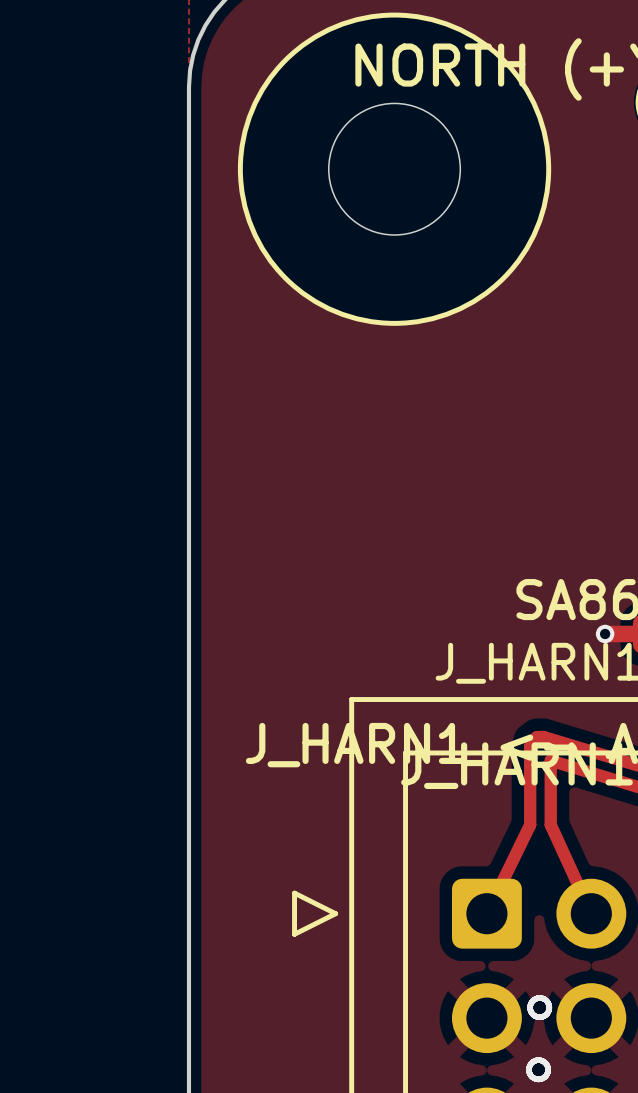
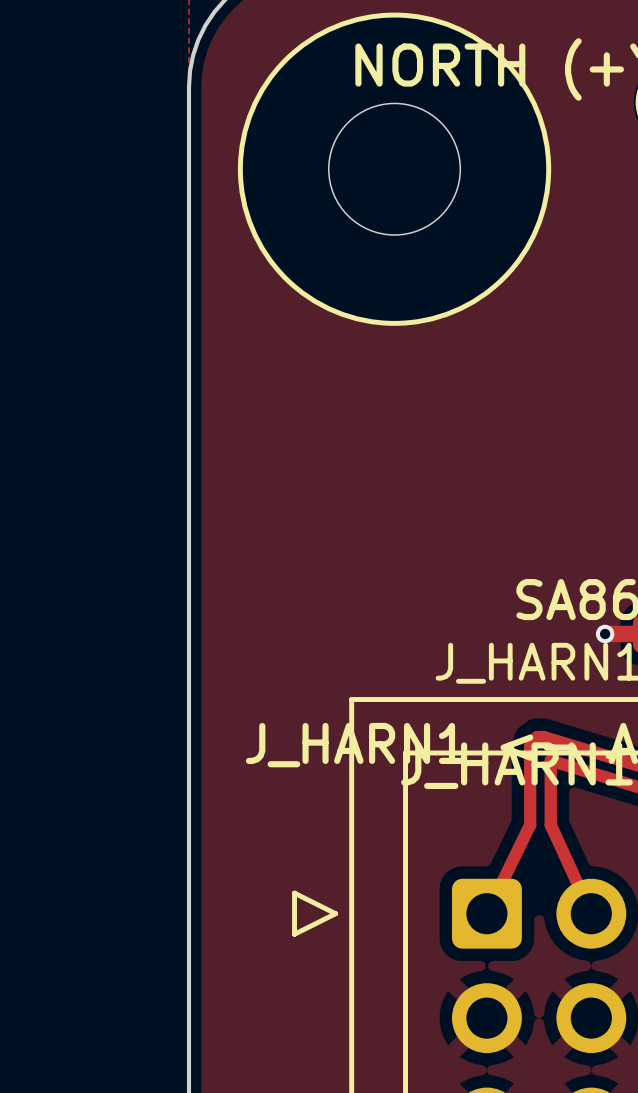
via: (539, 1007) -> none
via: (538, 1069) -> none

